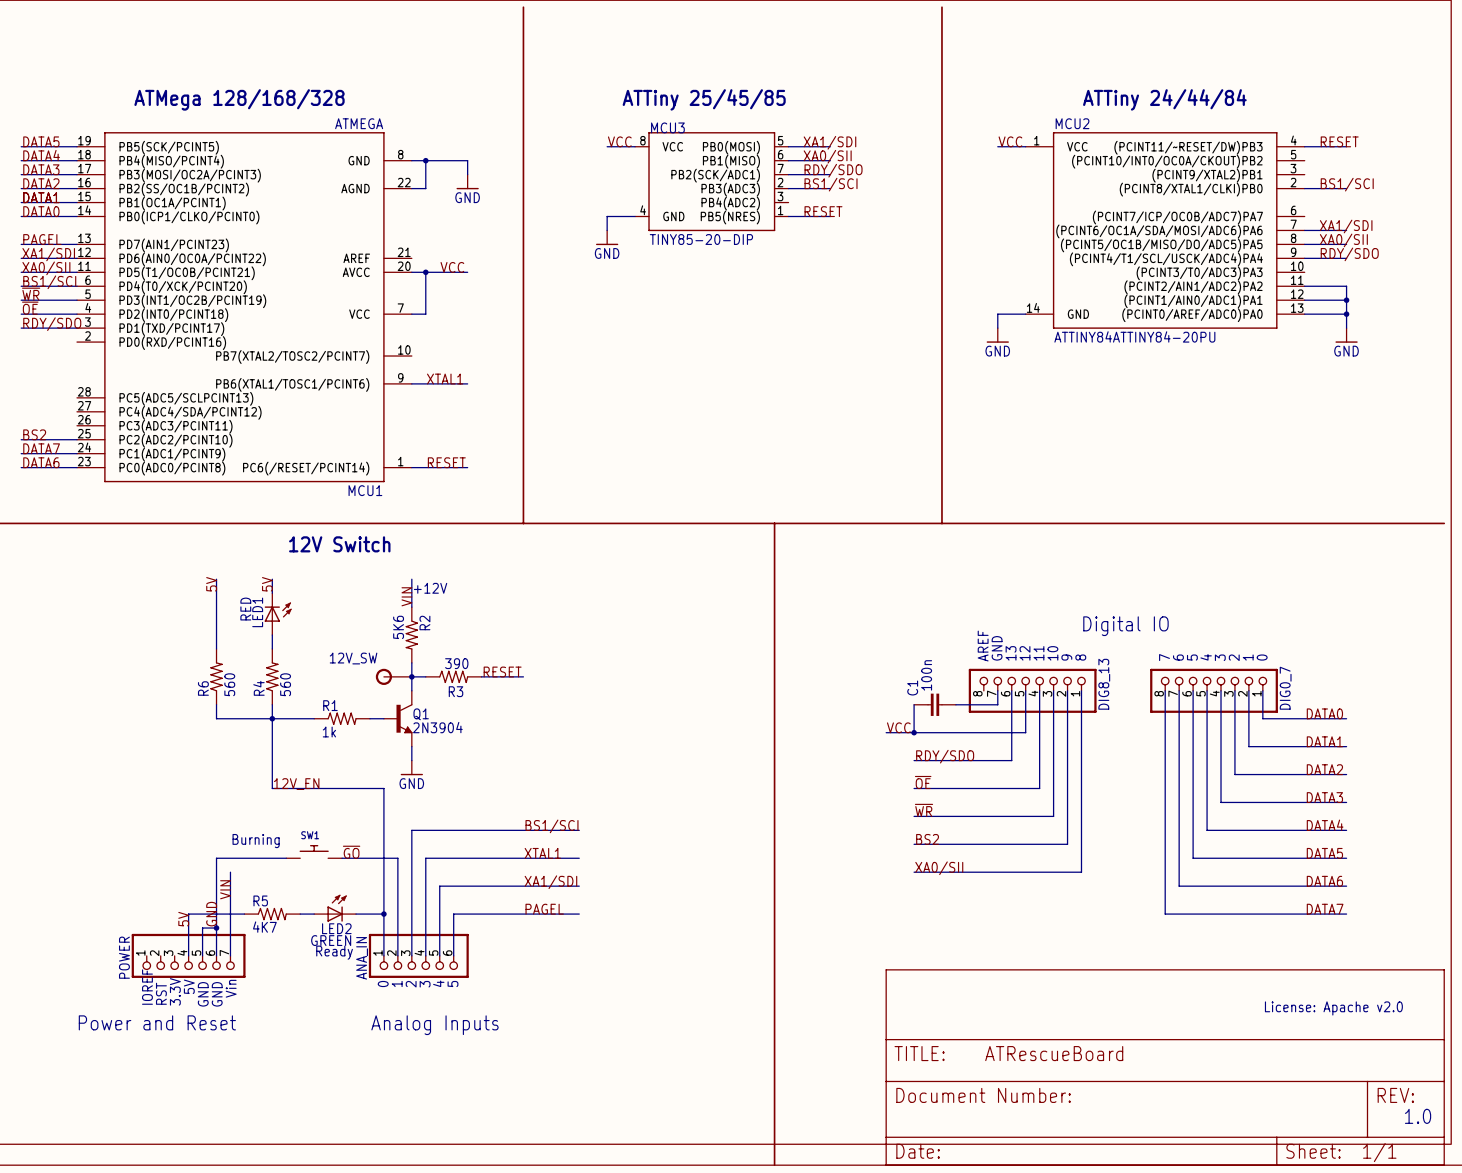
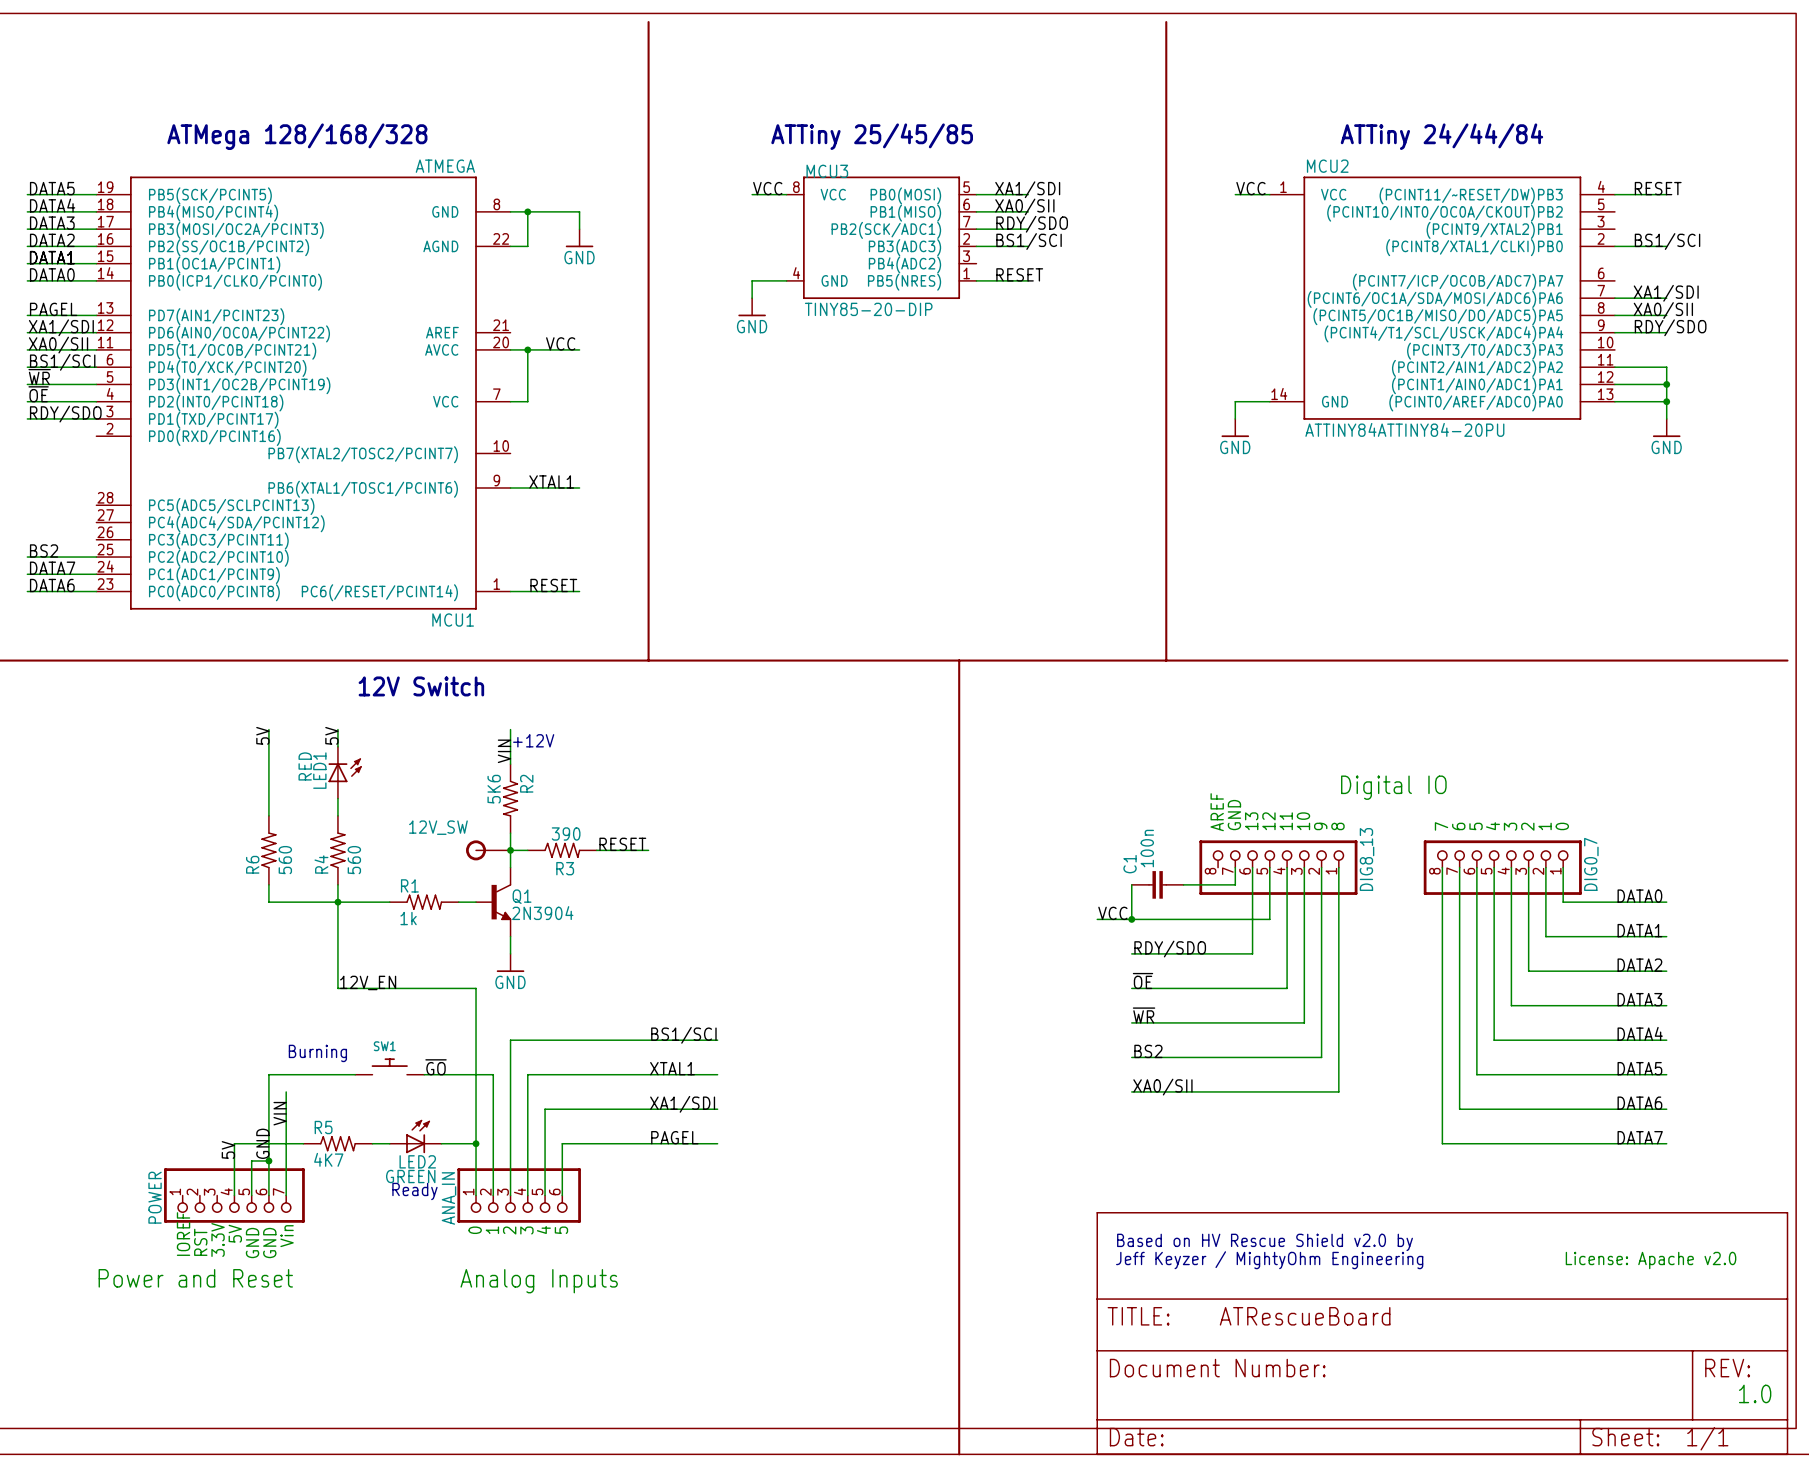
text: none -> Based on HV Rescue Shield v2.0 by (1265, 1242)
text: none -> Jeff Keyzer / MightyOhm Engineering (1269, 1260)

